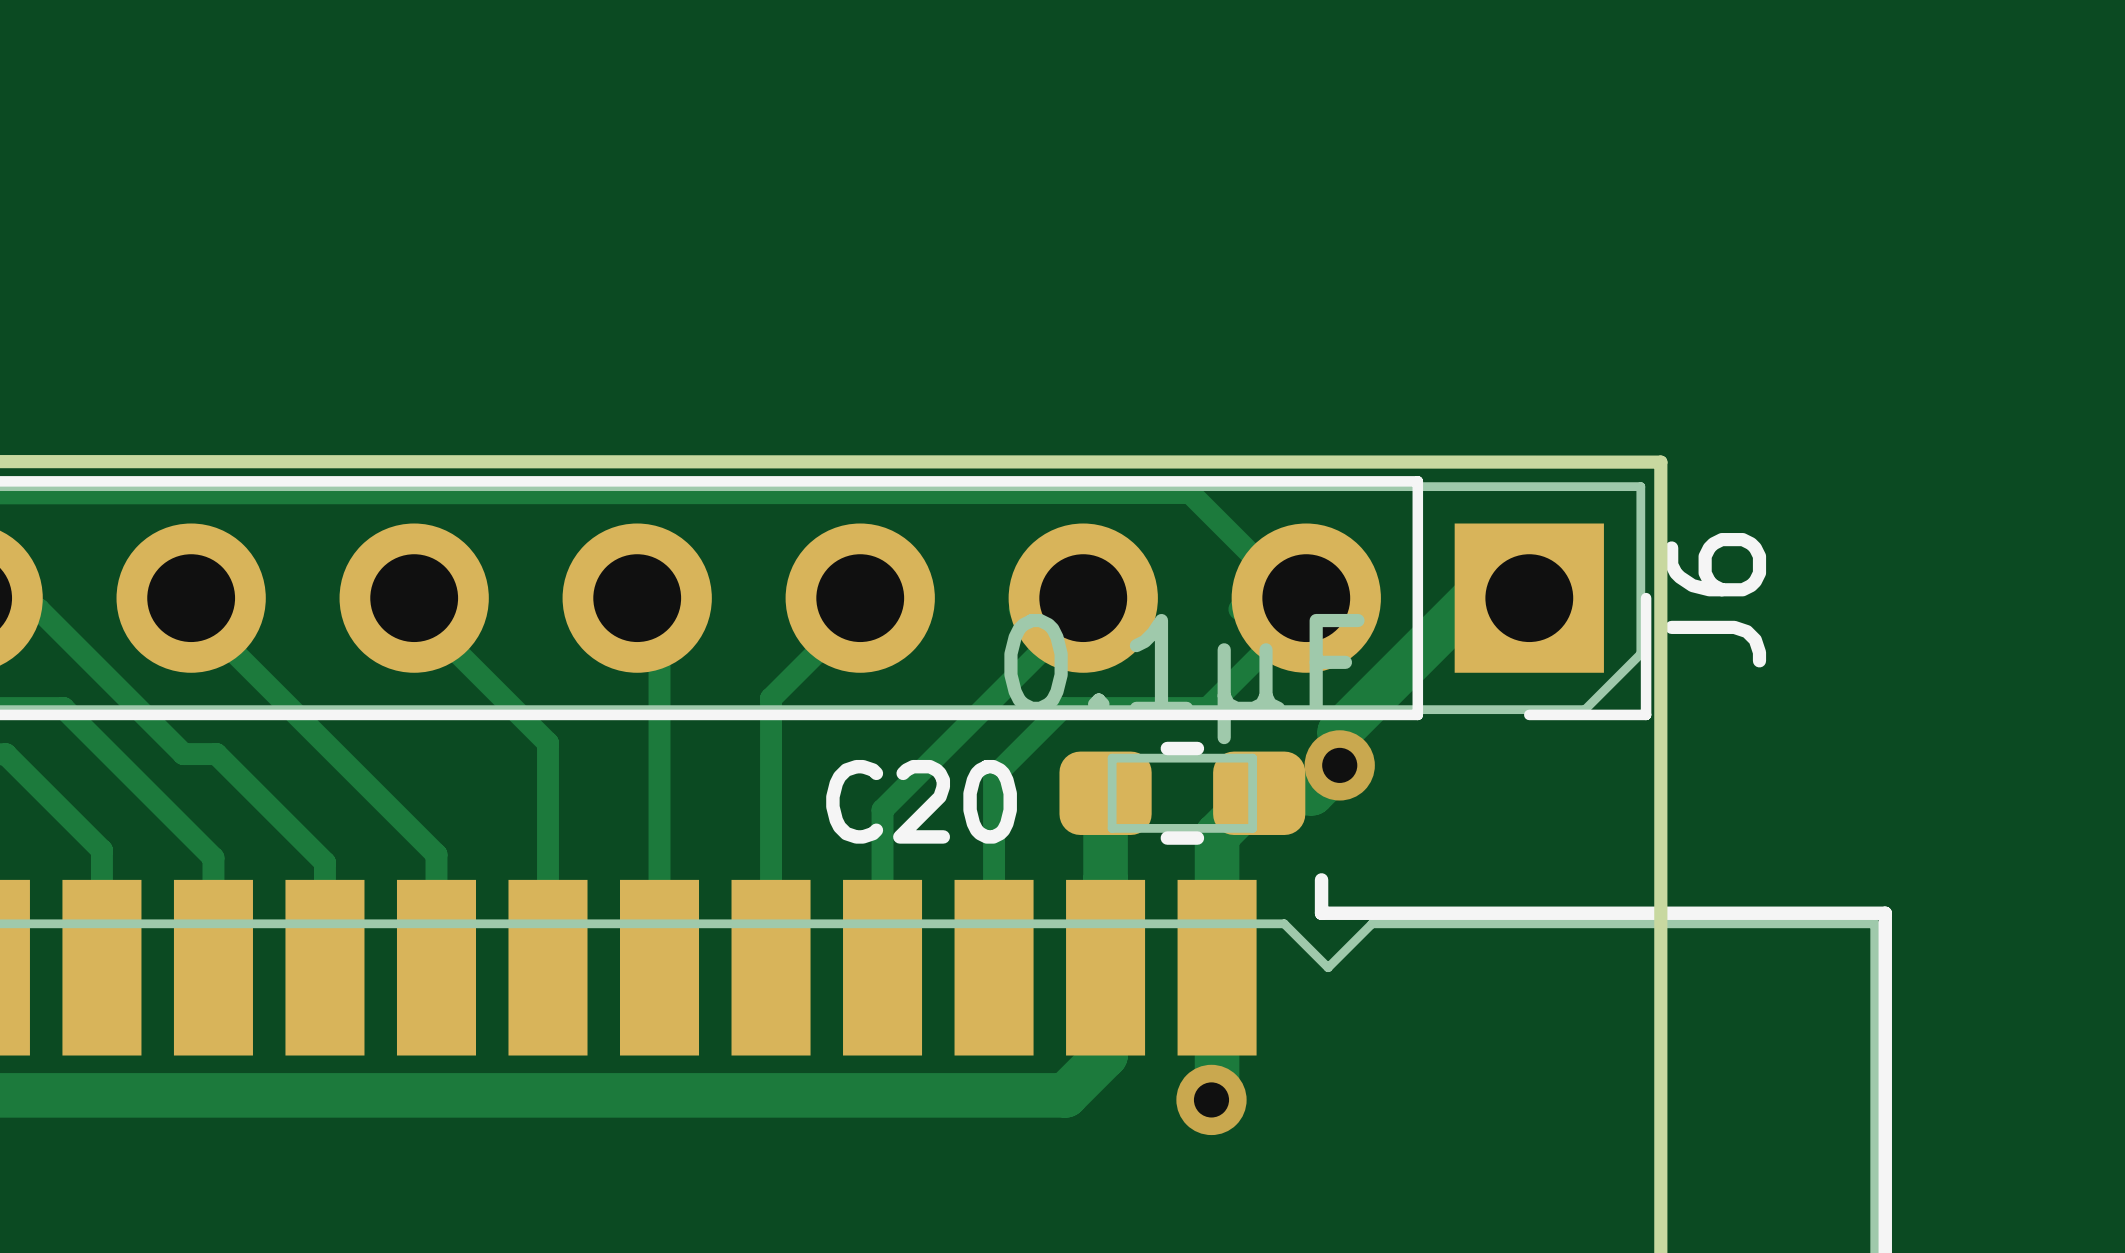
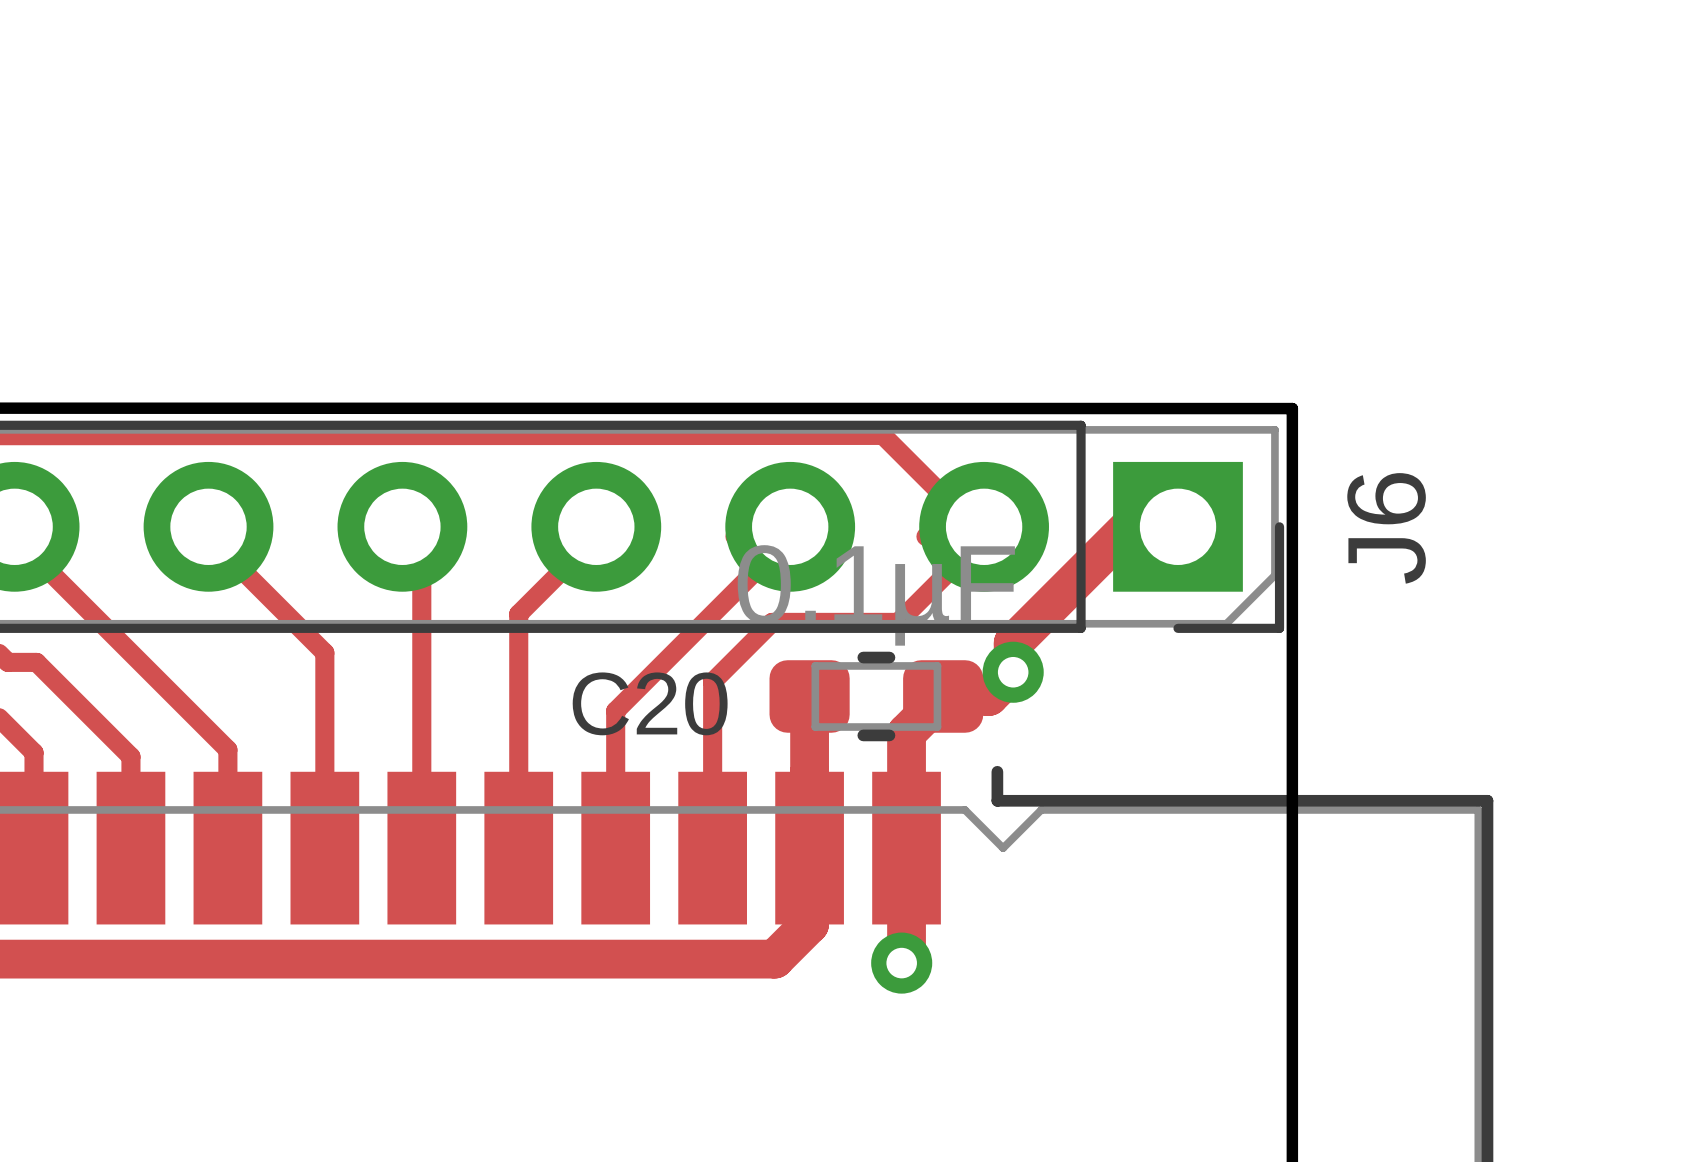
J6 name position: J6 (1715, 600) -> J6 (1386, 528)

